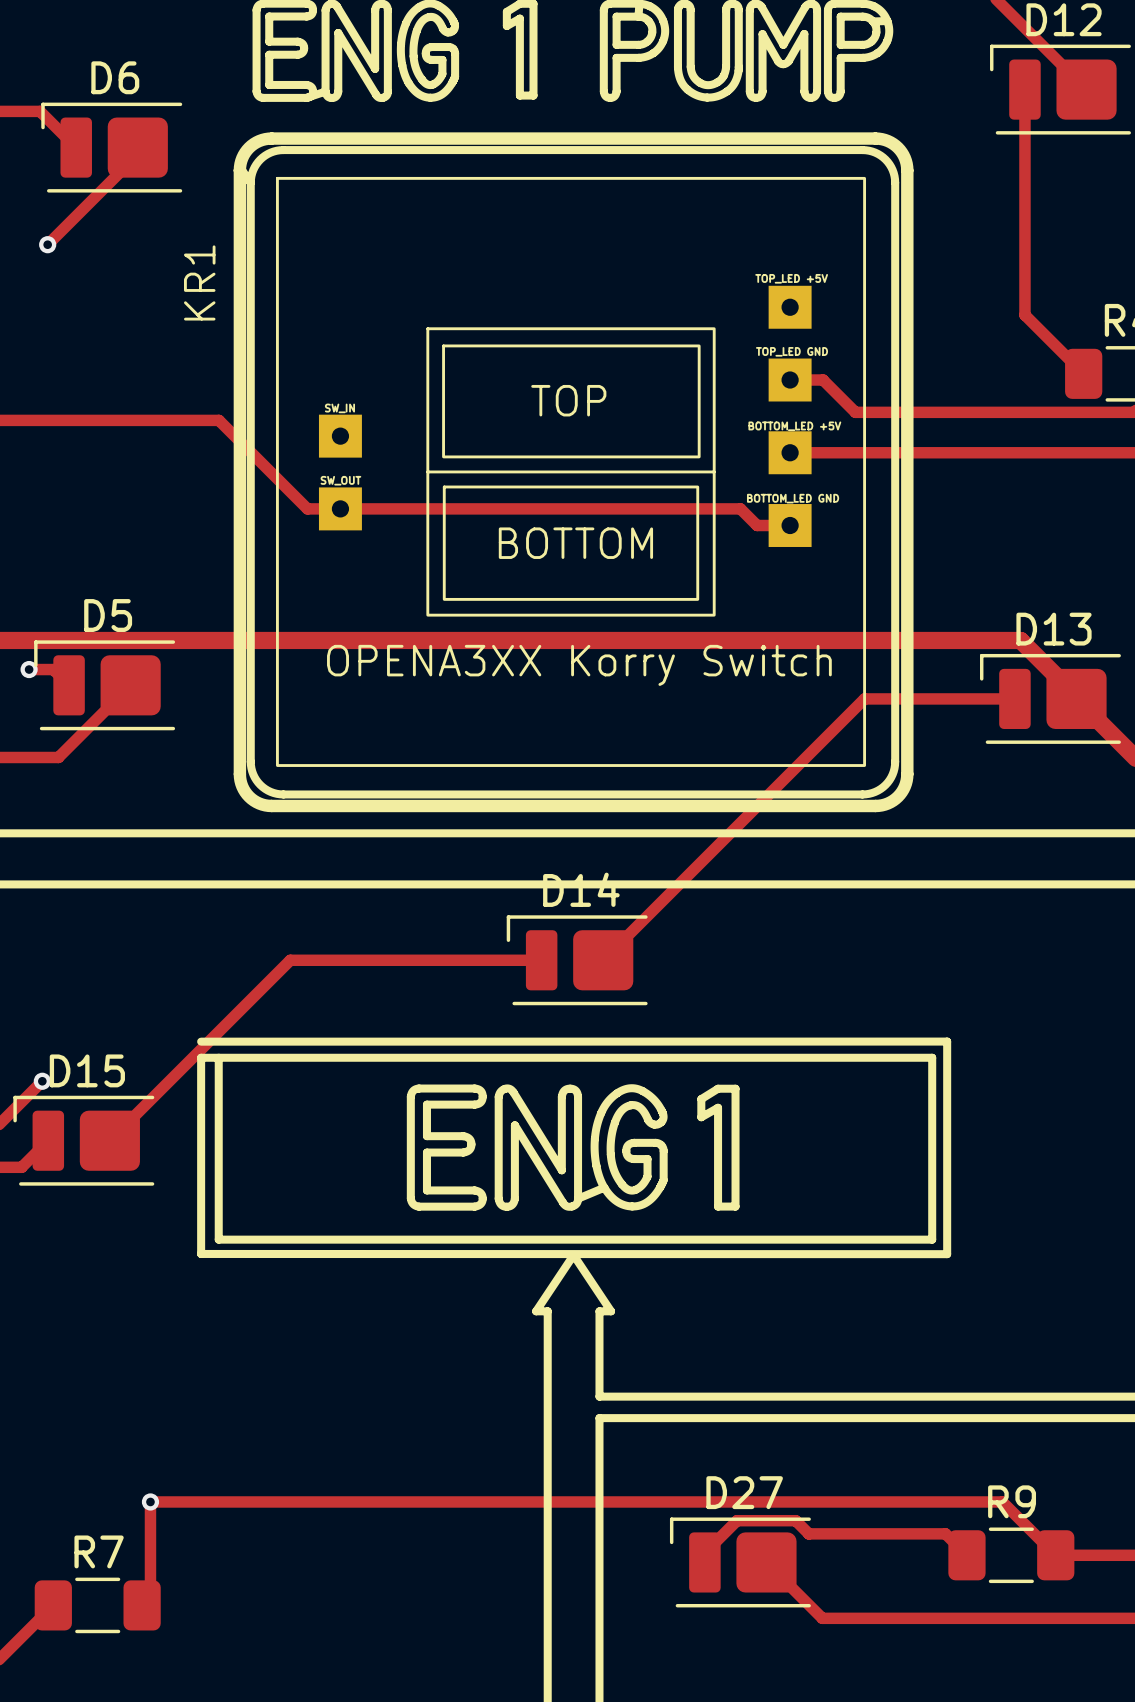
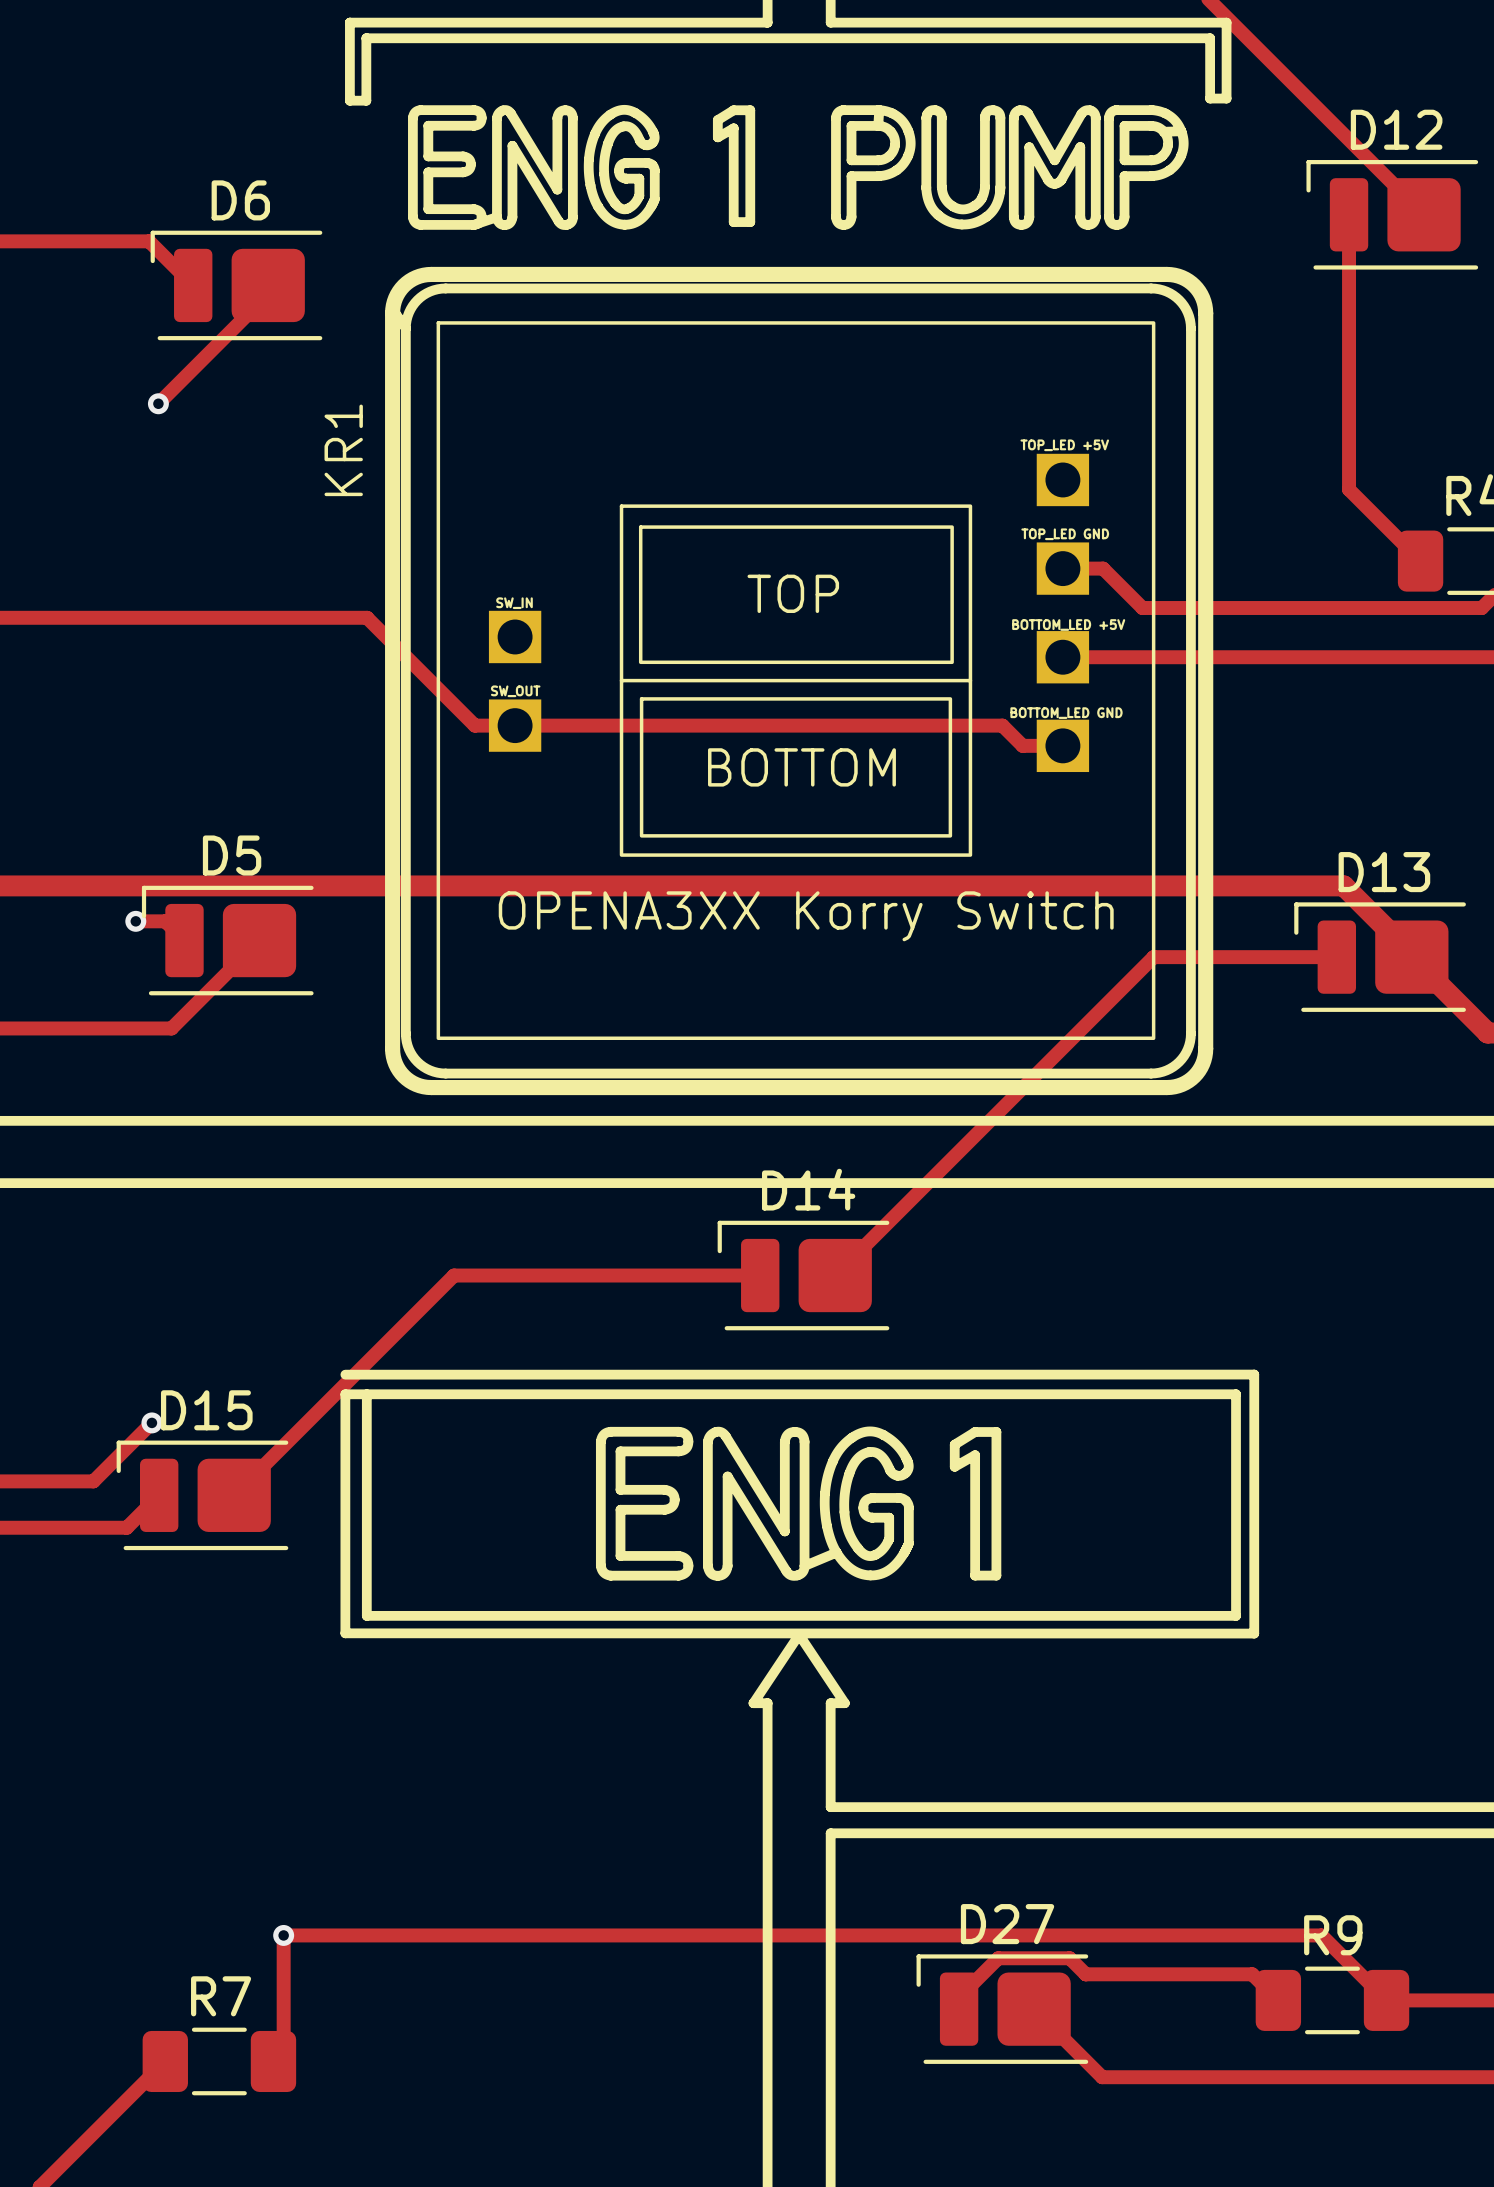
KR1 footprint: [276, 176, 867, 767] -> [436, 321, 1156, 1041]

